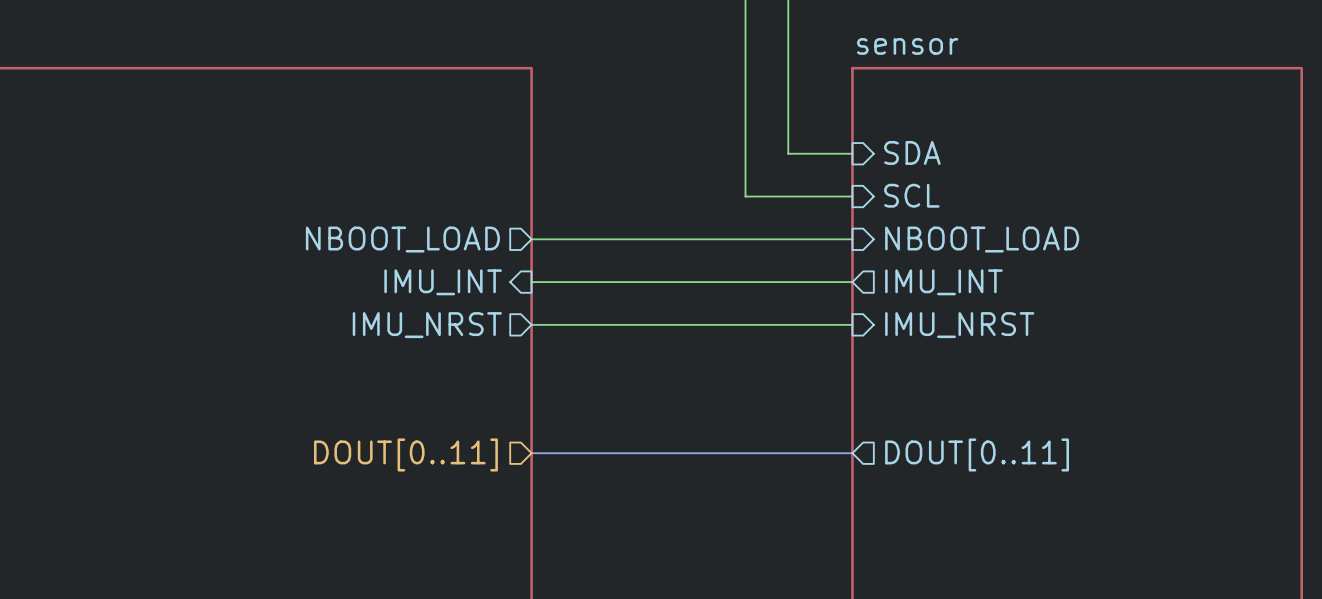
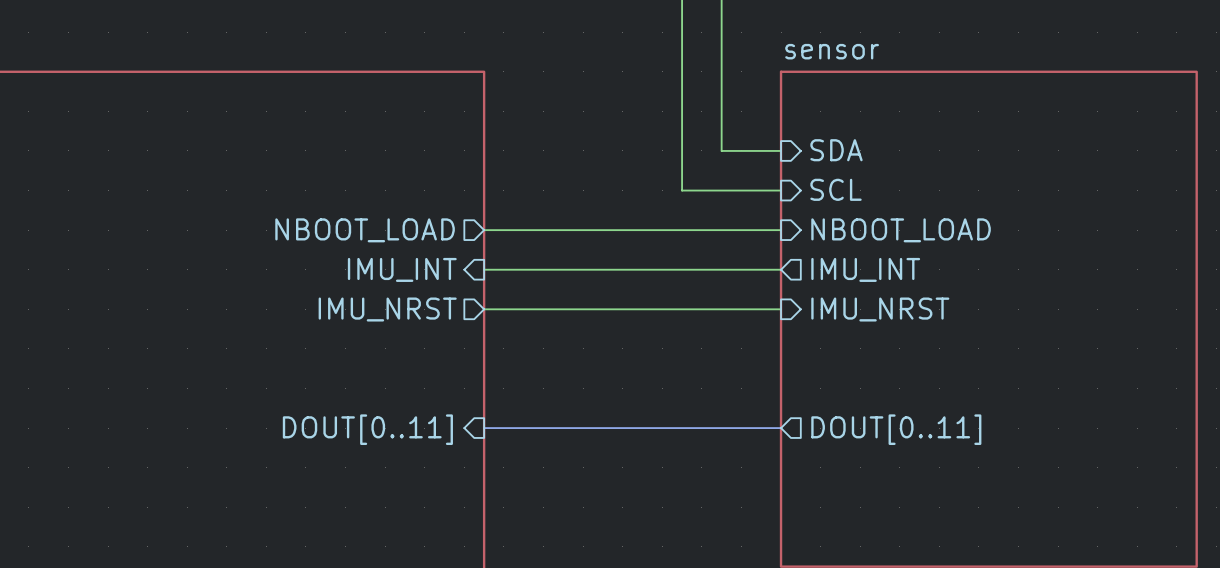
hierarchical label: DOUT[0..11] (405, 454) -> none
sheet pin: none -> DOUT[0..11] (367, 429)

